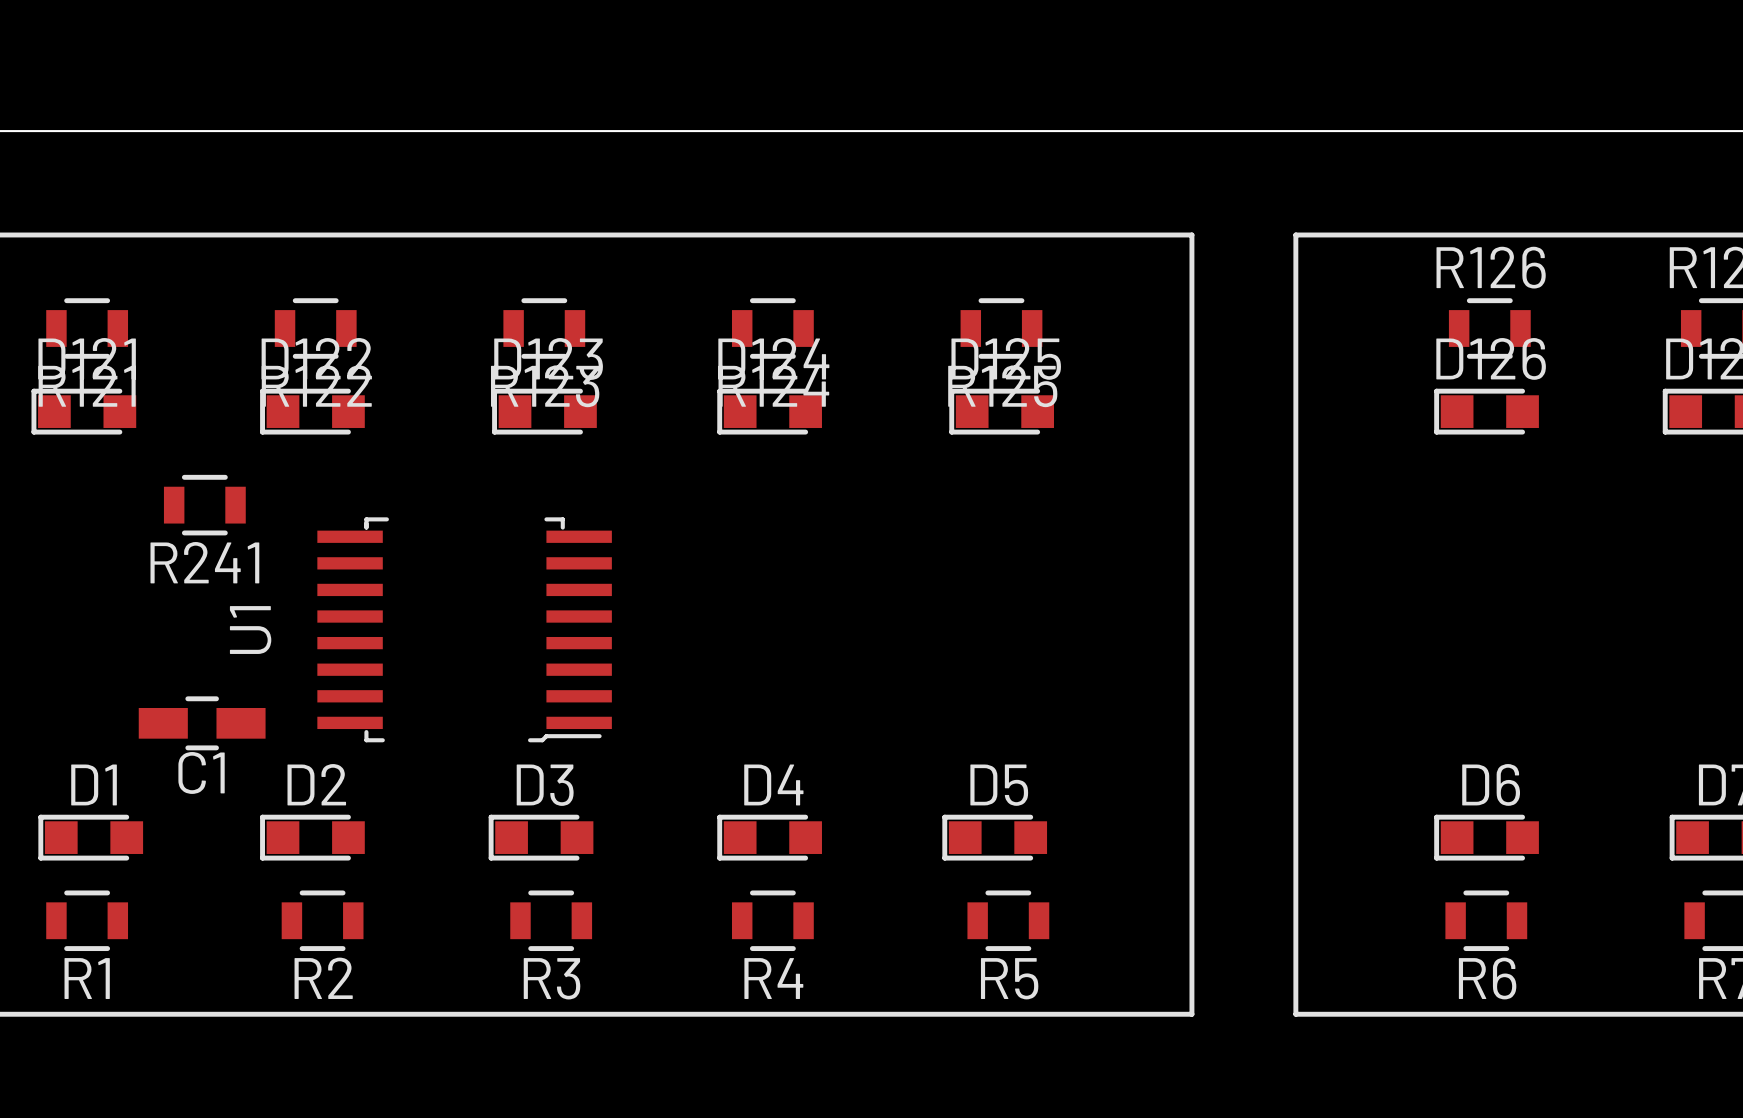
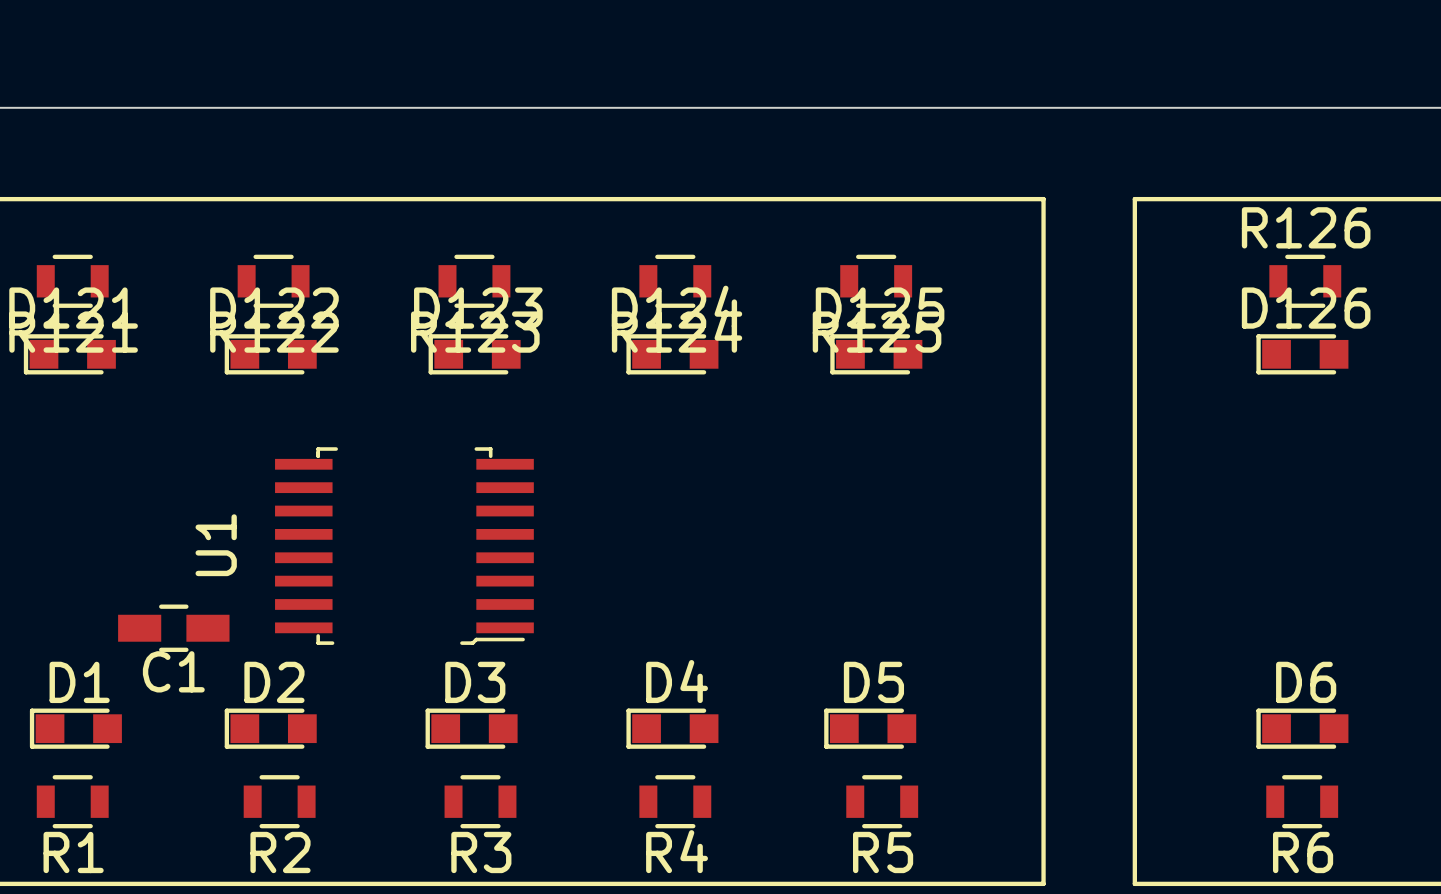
R241: (204, 505) -> none

